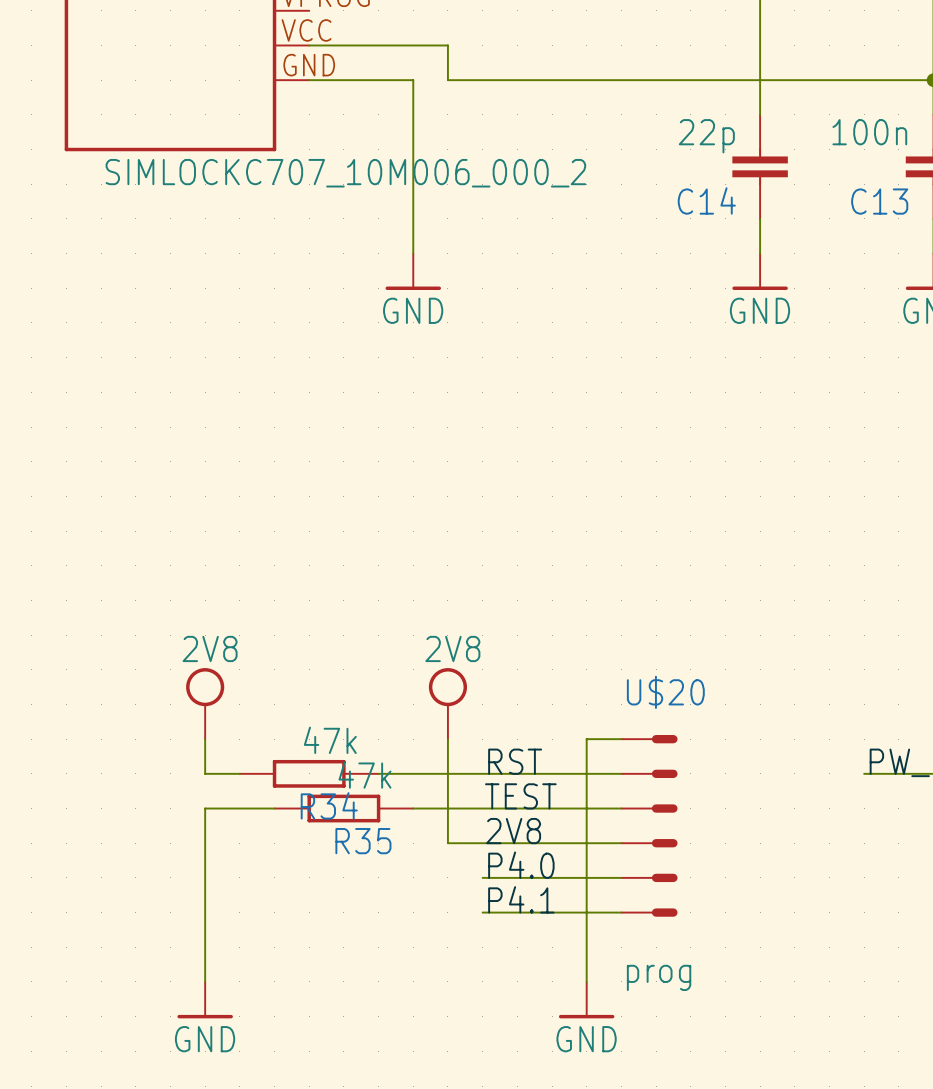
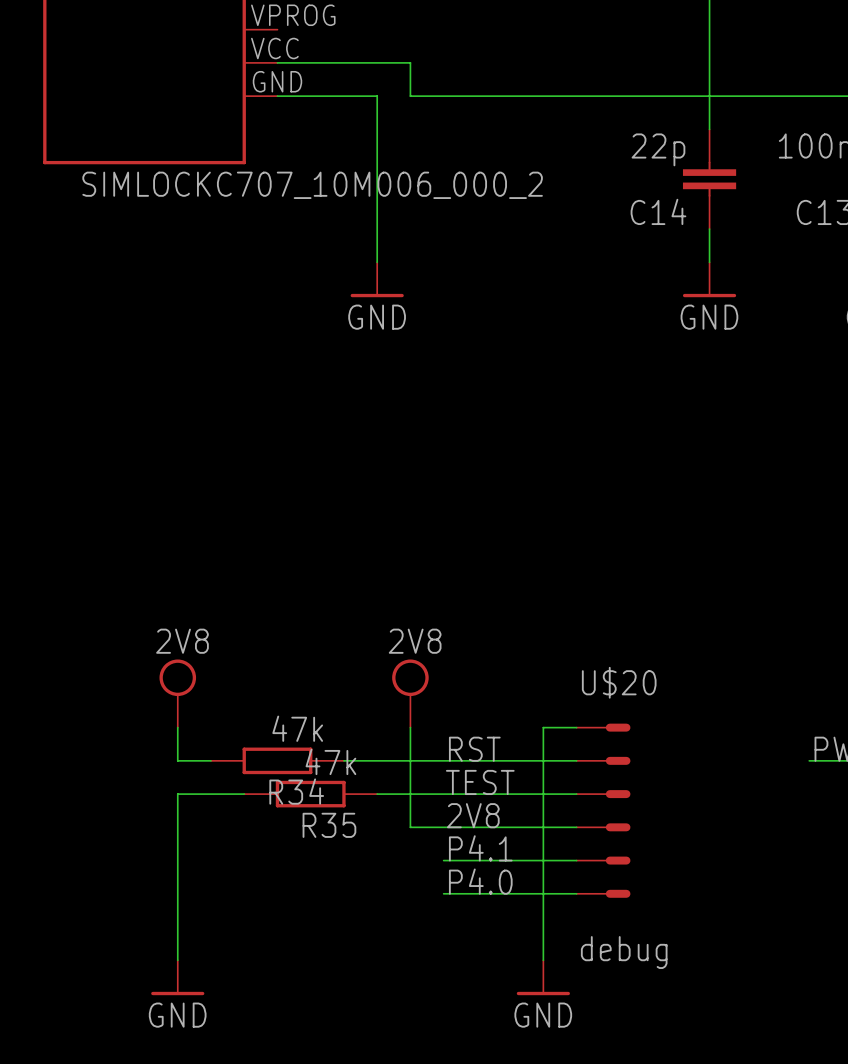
label: P4.0 (521, 865) -> P4.1 (480, 848)
label: P4.1 (521, 899) -> P4.0 (480, 881)
U$20 value: prog (659, 977) -> debug (624, 952)

